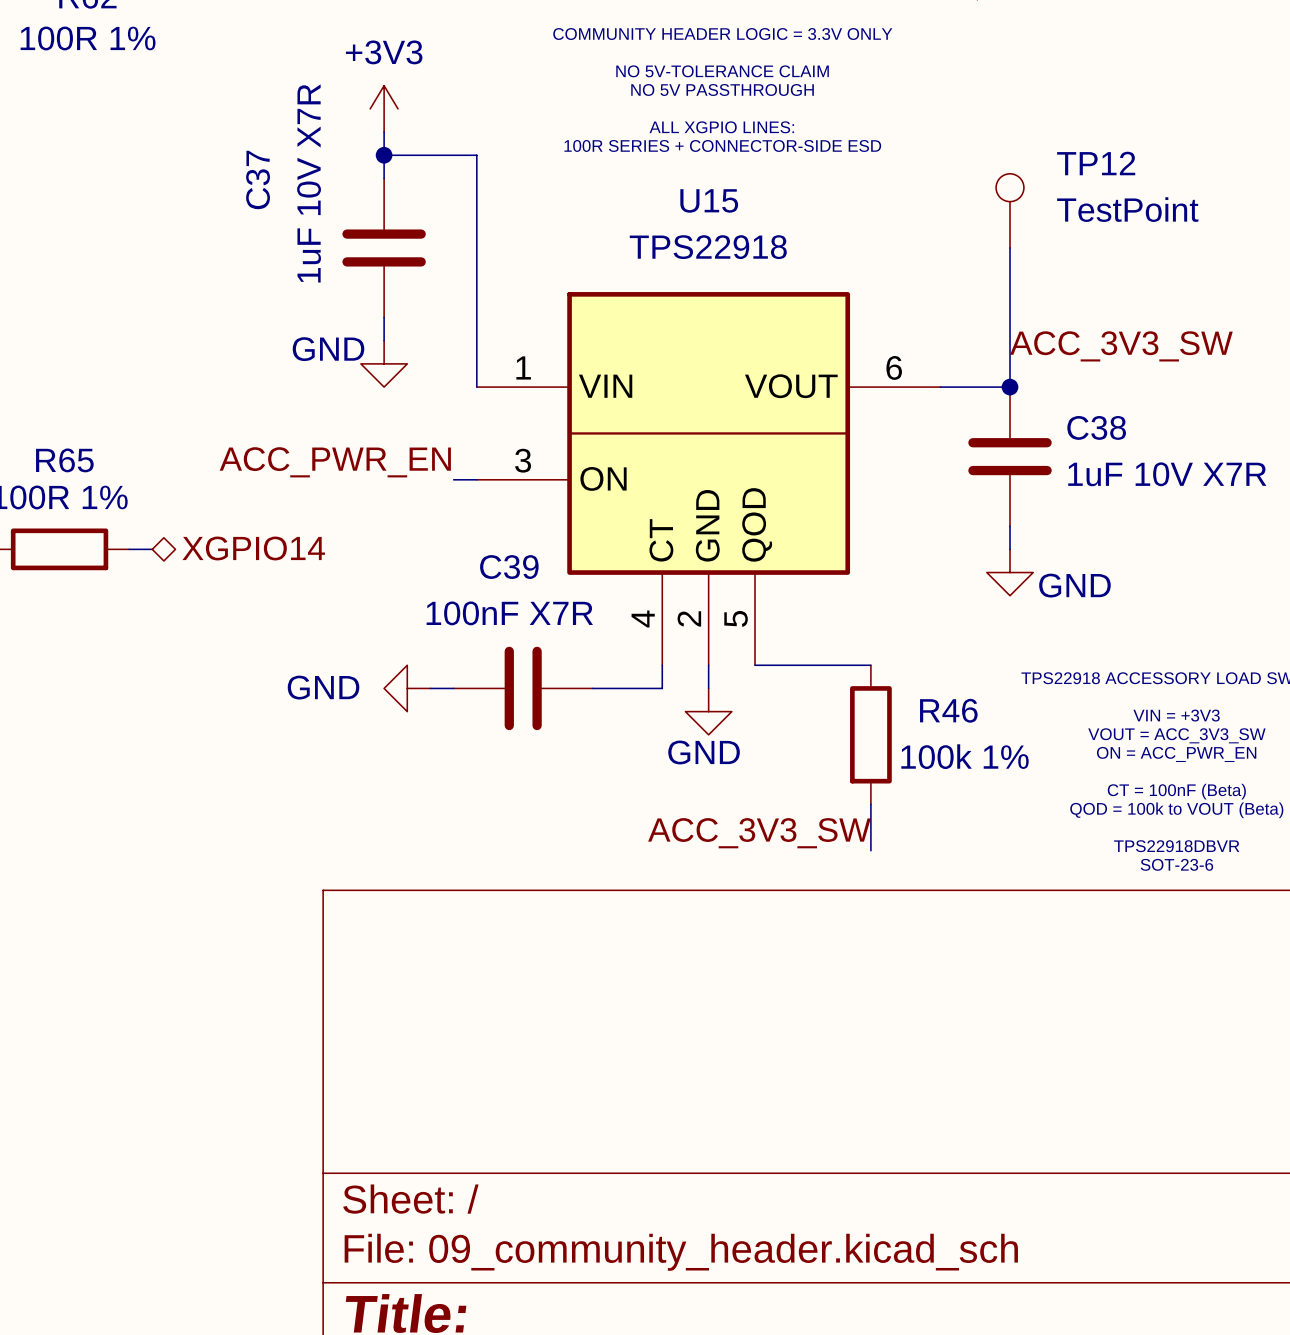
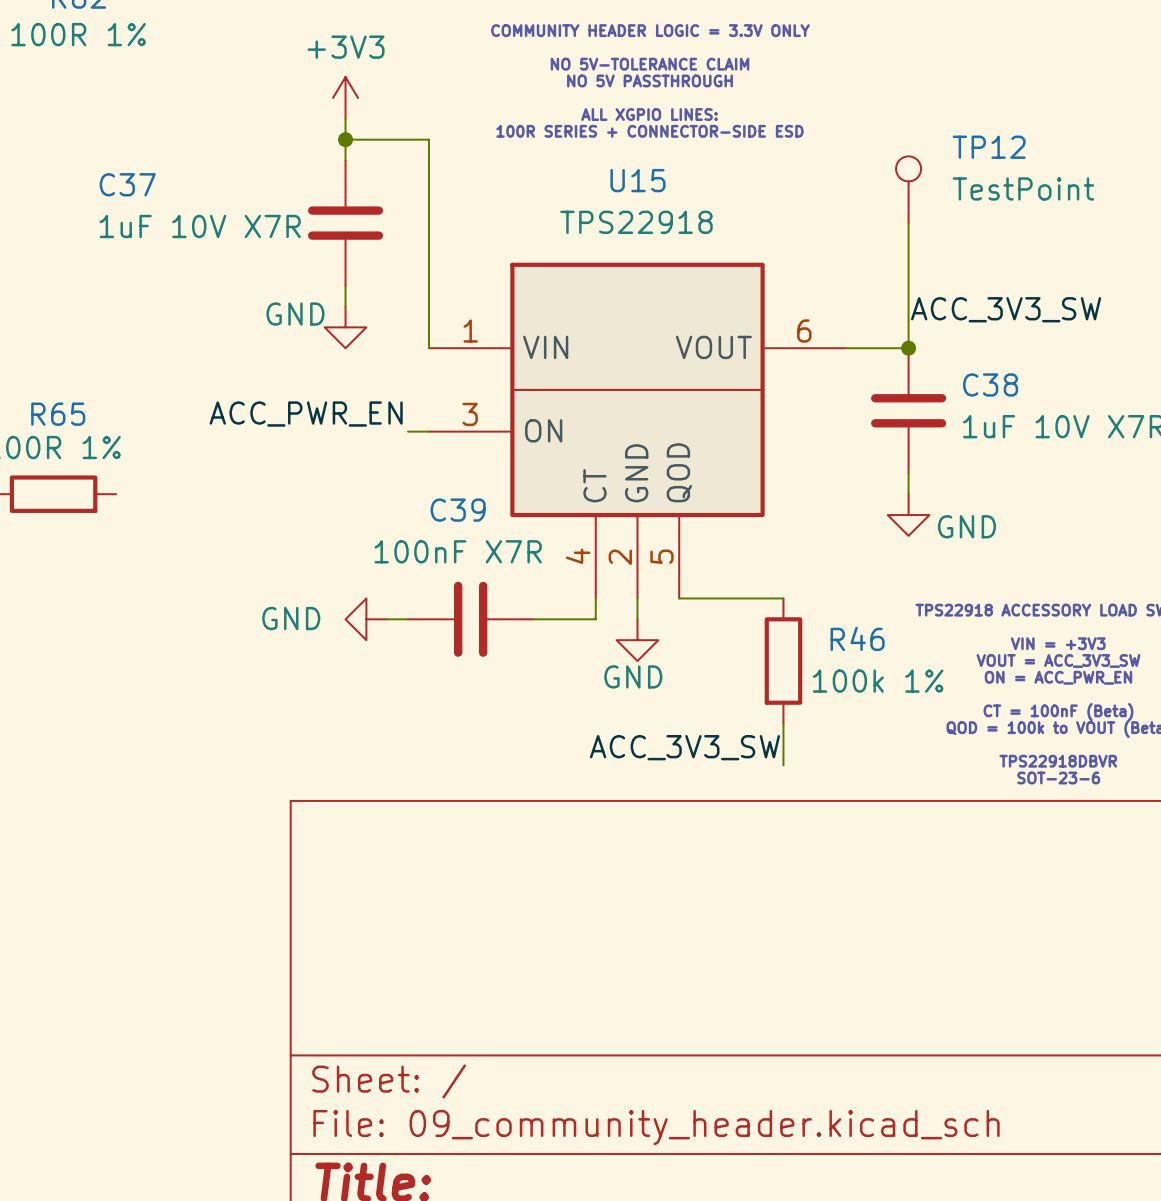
C37 name rotation: 0° (258, 179) -> 90° clockwise (127, 184)
C37 name position: C37 (258, 179) -> C37 (127, 184)
C37 value rotation: 0° (309, 183) -> 90° clockwise (200, 226)
hierarchical label: XGPIO14 (253, 548) -> none
wire: (129, 549) (152, 549) -> none

